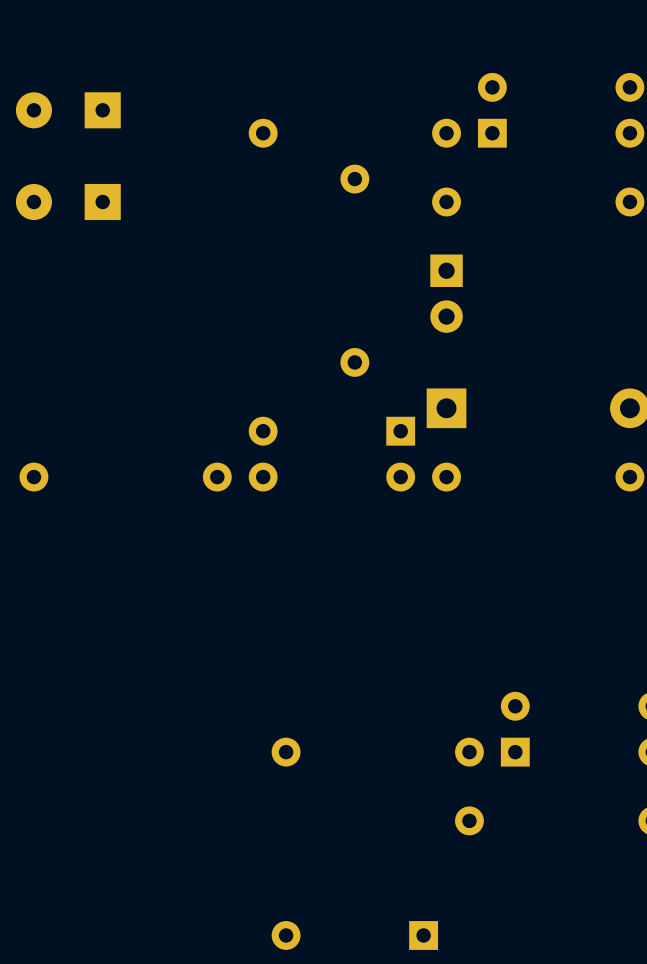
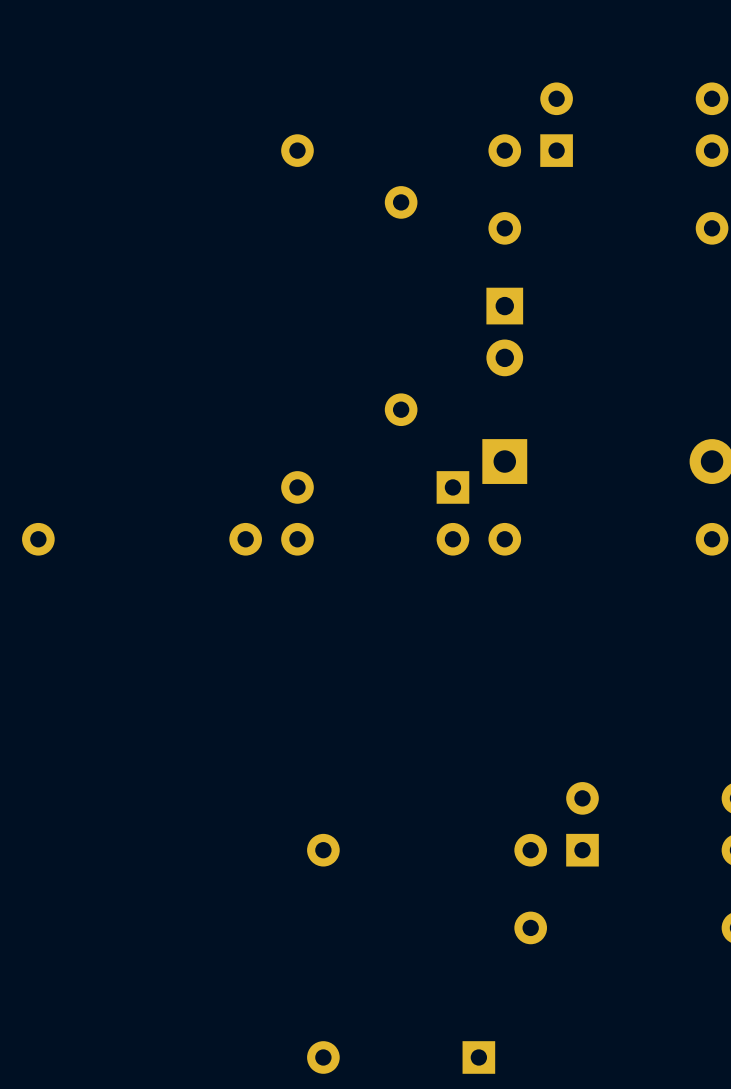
part: (68, 110) -> none
part: (68, 201) -> none

